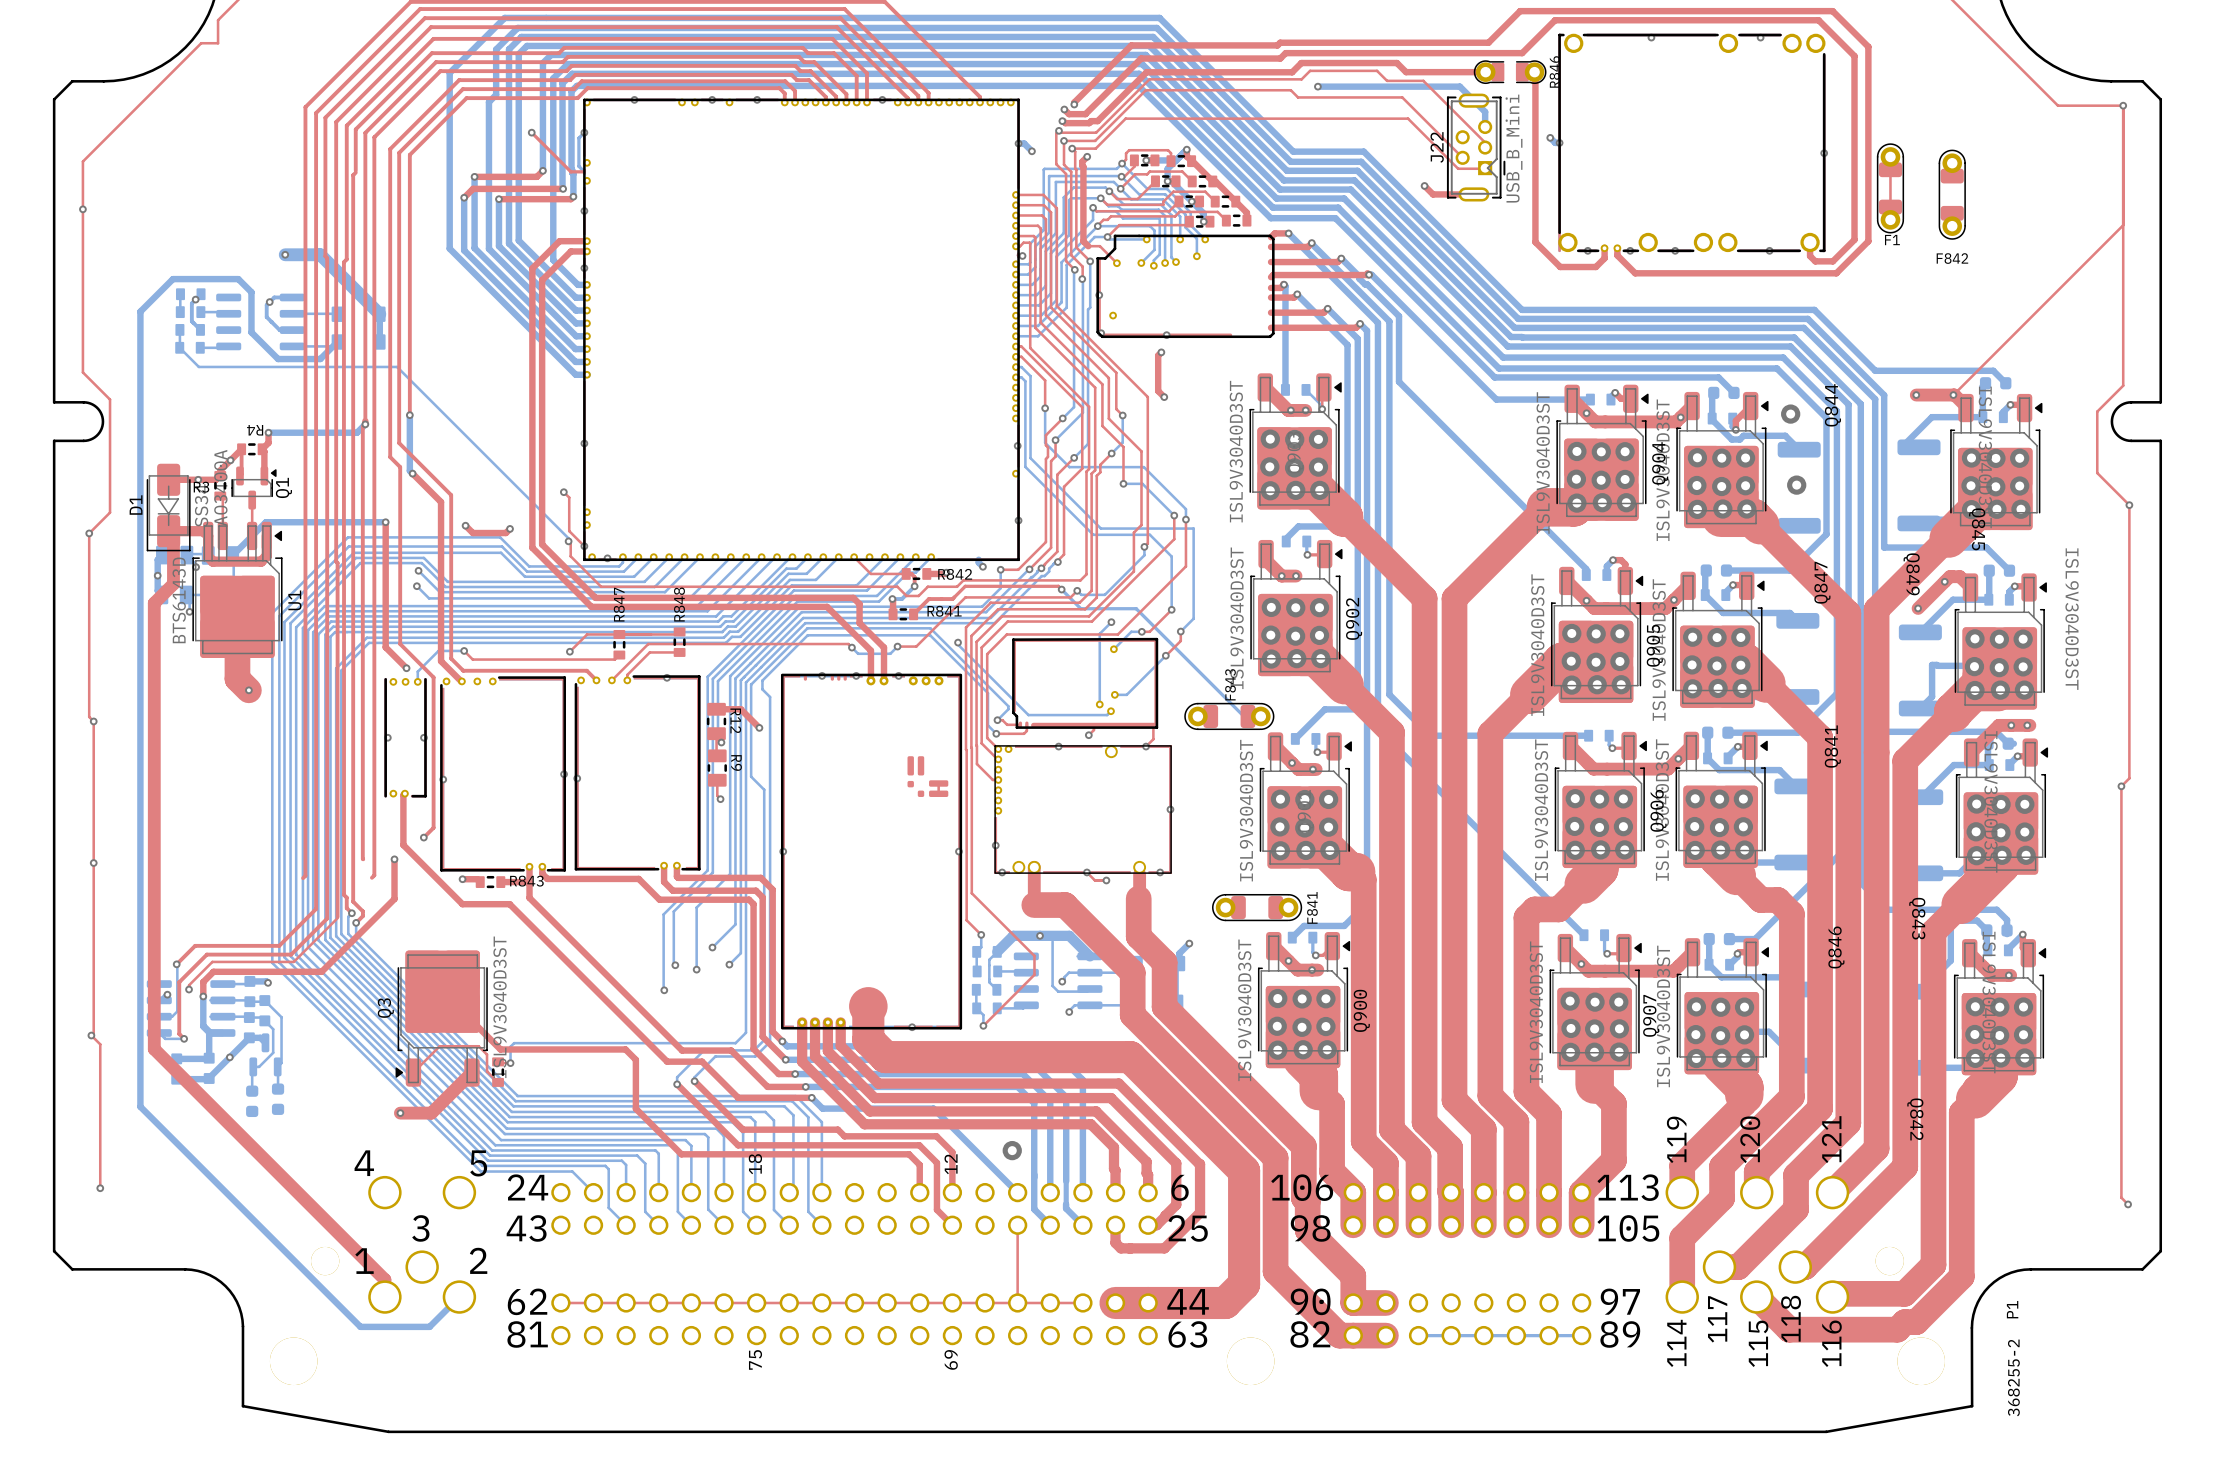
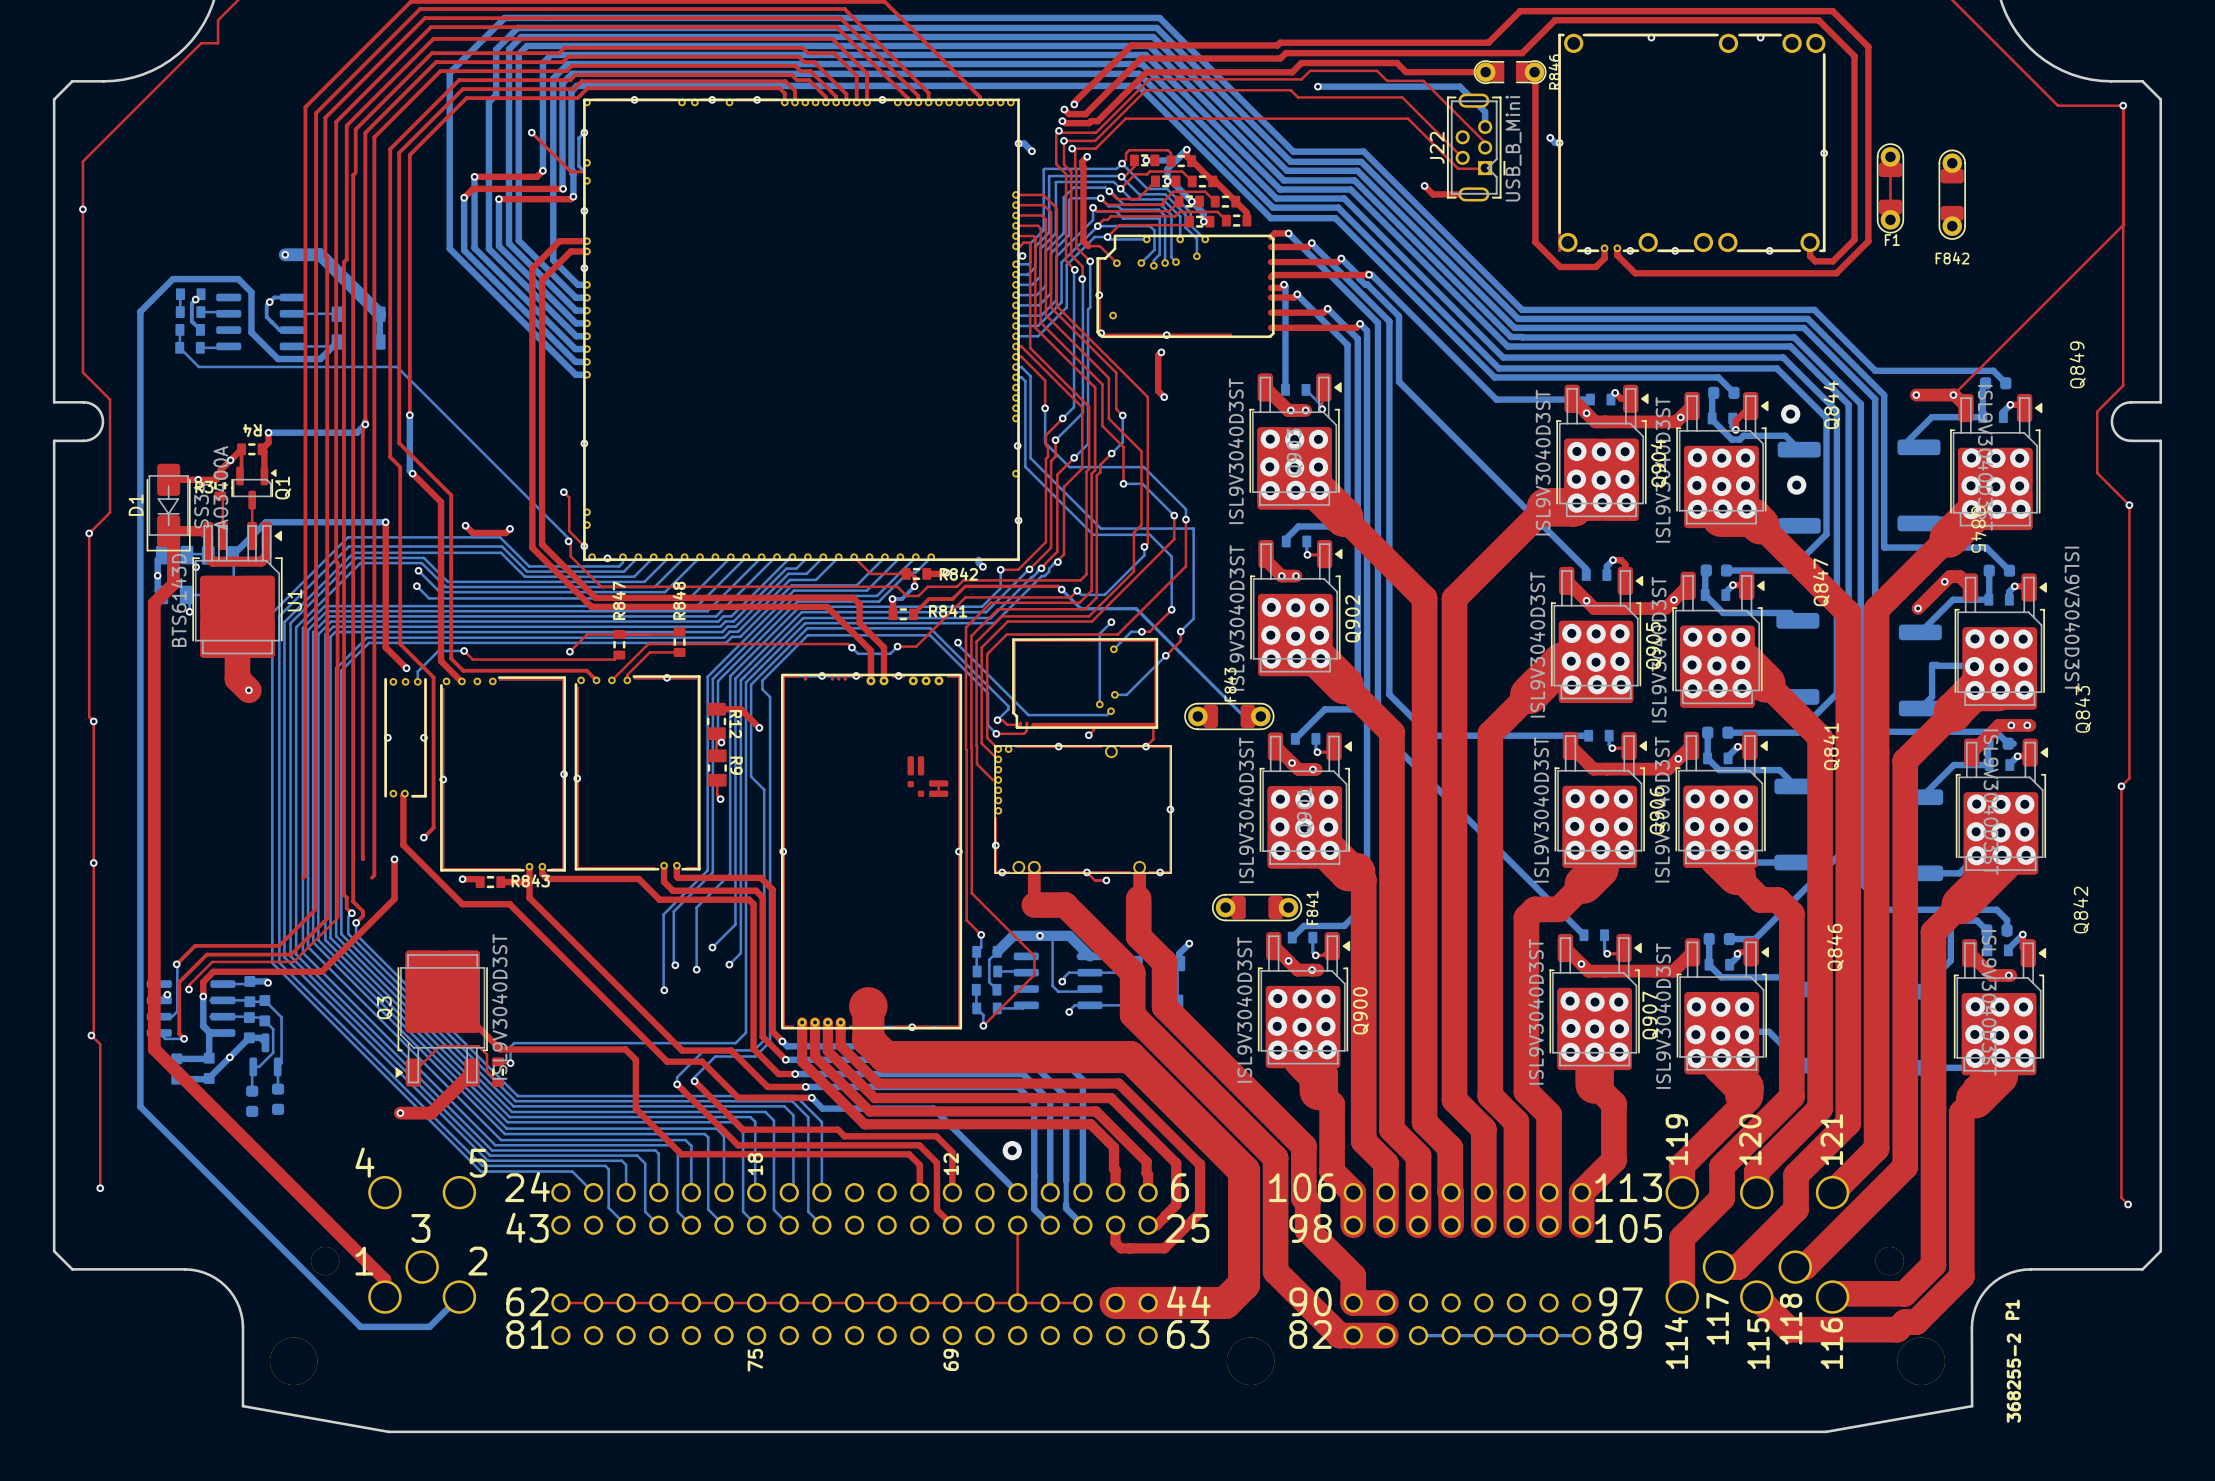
Q849 name rotation: 0° (1911, 574) -> 180° (2077, 364)
Q849 name position: Q849 (1911, 574) -> Q849 (2077, 364)
Q843 name rotation: 0° (1917, 918) -> 180° (2083, 709)
Q843 name position: Q843 (1917, 918) -> Q843 (2083, 709)
Q842 name rotation: 0° (1915, 1119) -> 180° (2081, 910)
Q842 name position: Q842 (1915, 1119) -> Q842 (2081, 910)

